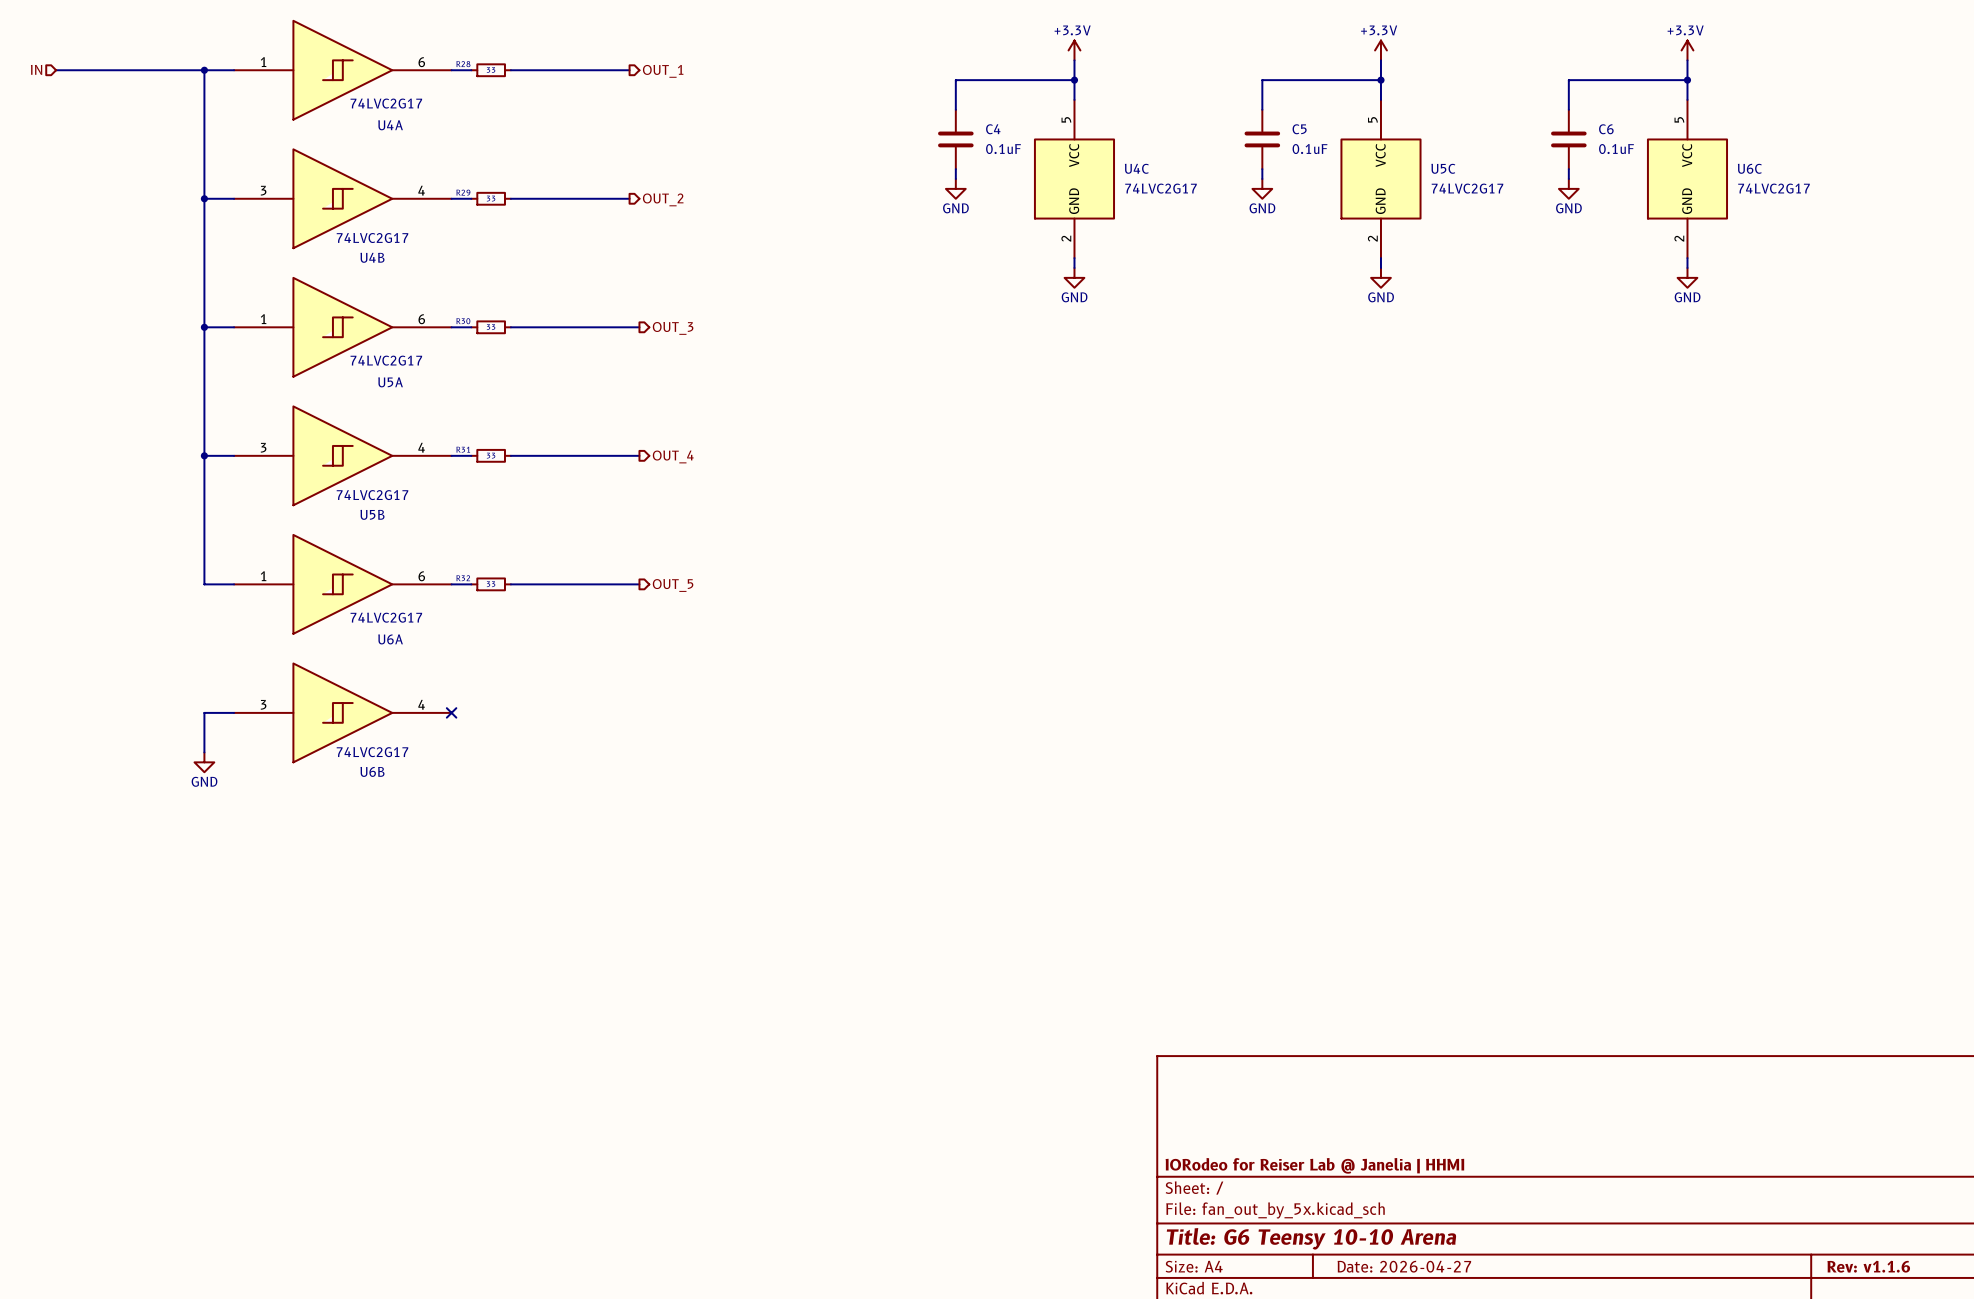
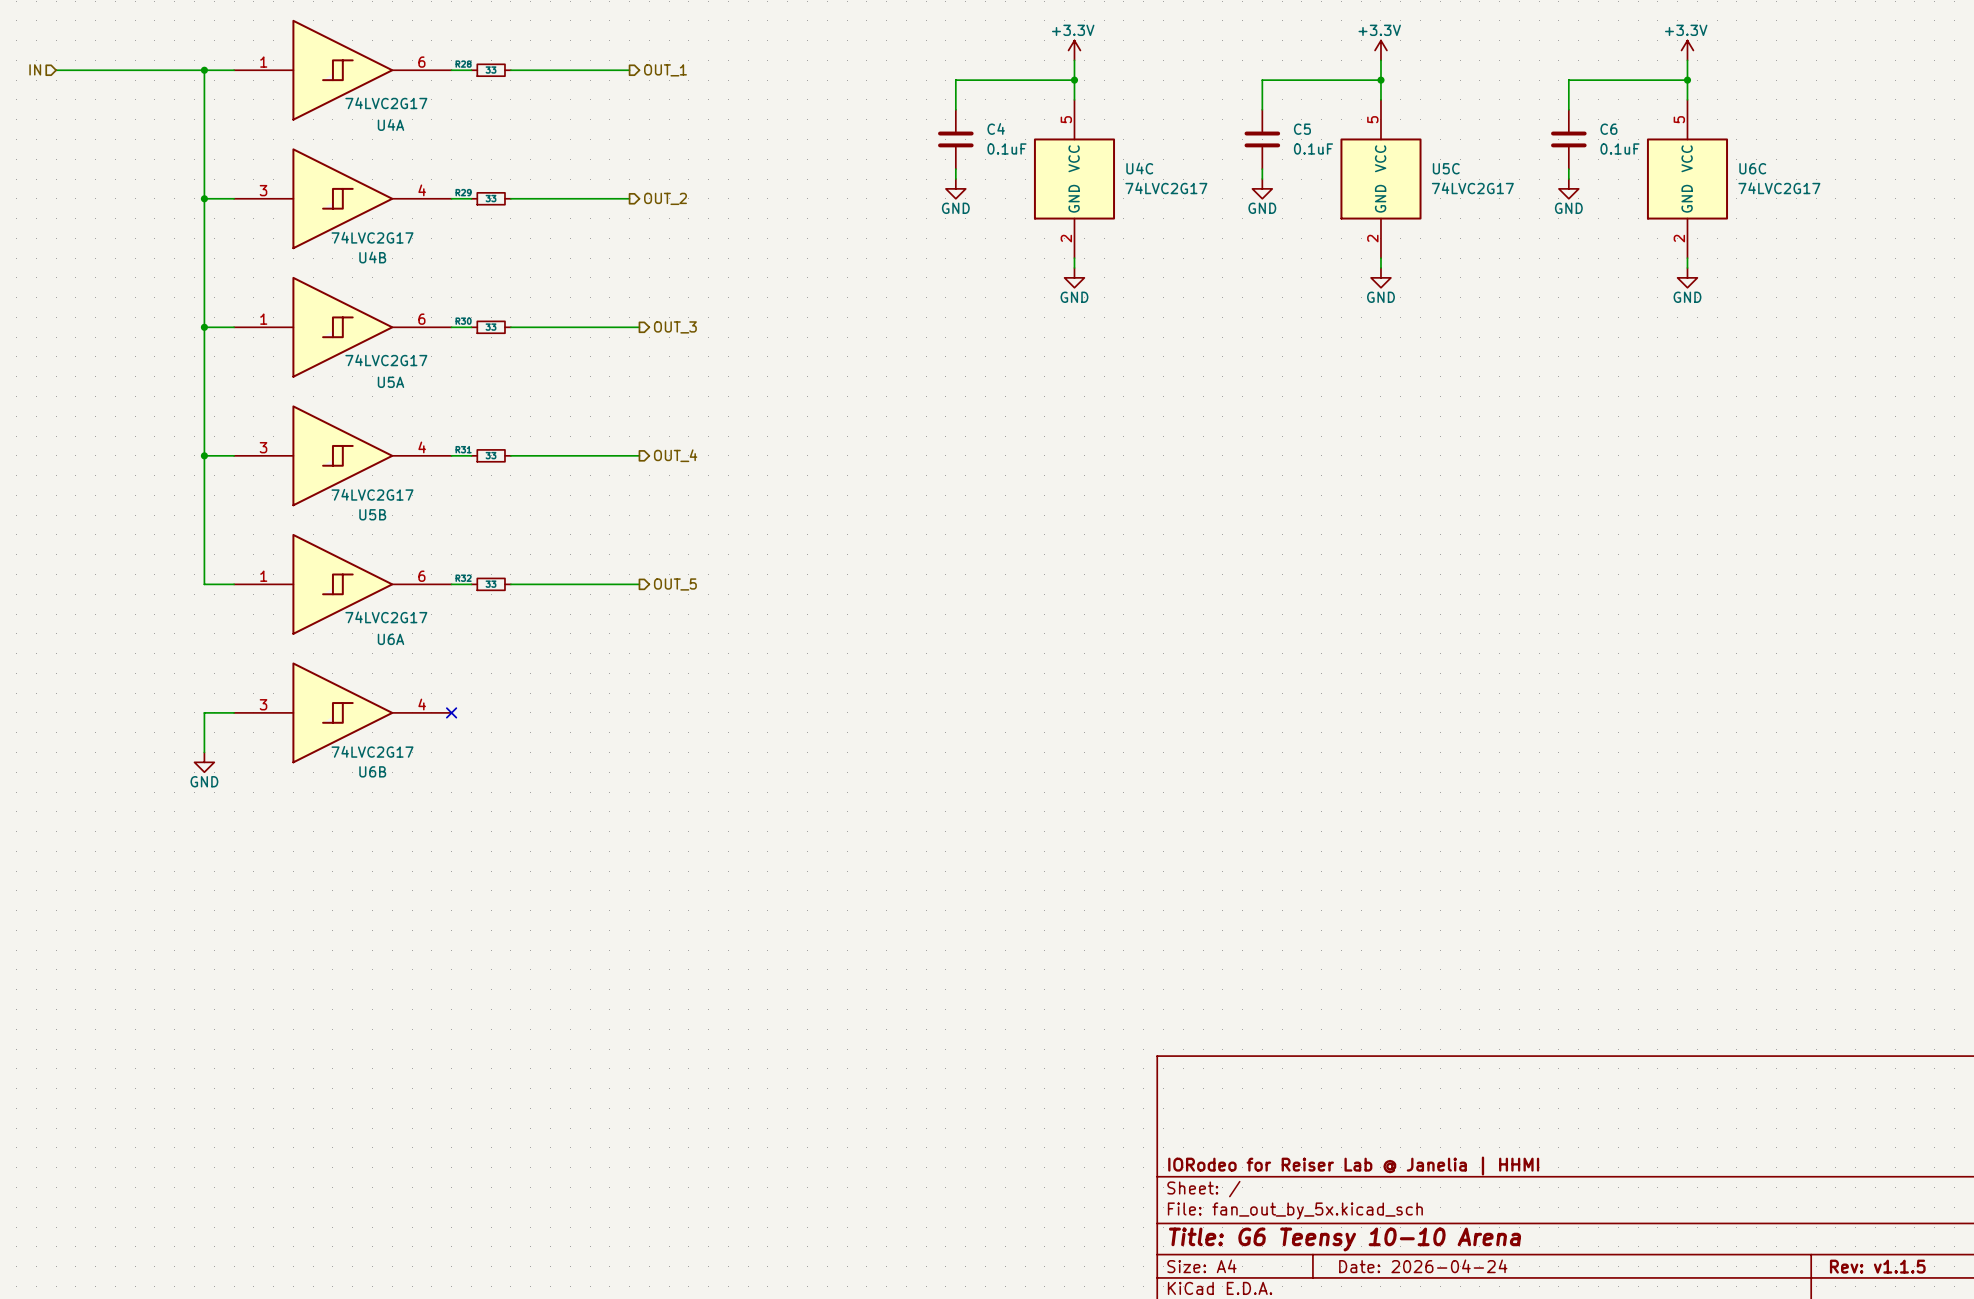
title block: Date: 2026-04-27 (1404, 1266) -> Date: 2026-04-24 (1423, 1266)
title block: Rev: v1.1.6 (1868, 1266) -> Rev: v1.1.5 (1877, 1266)

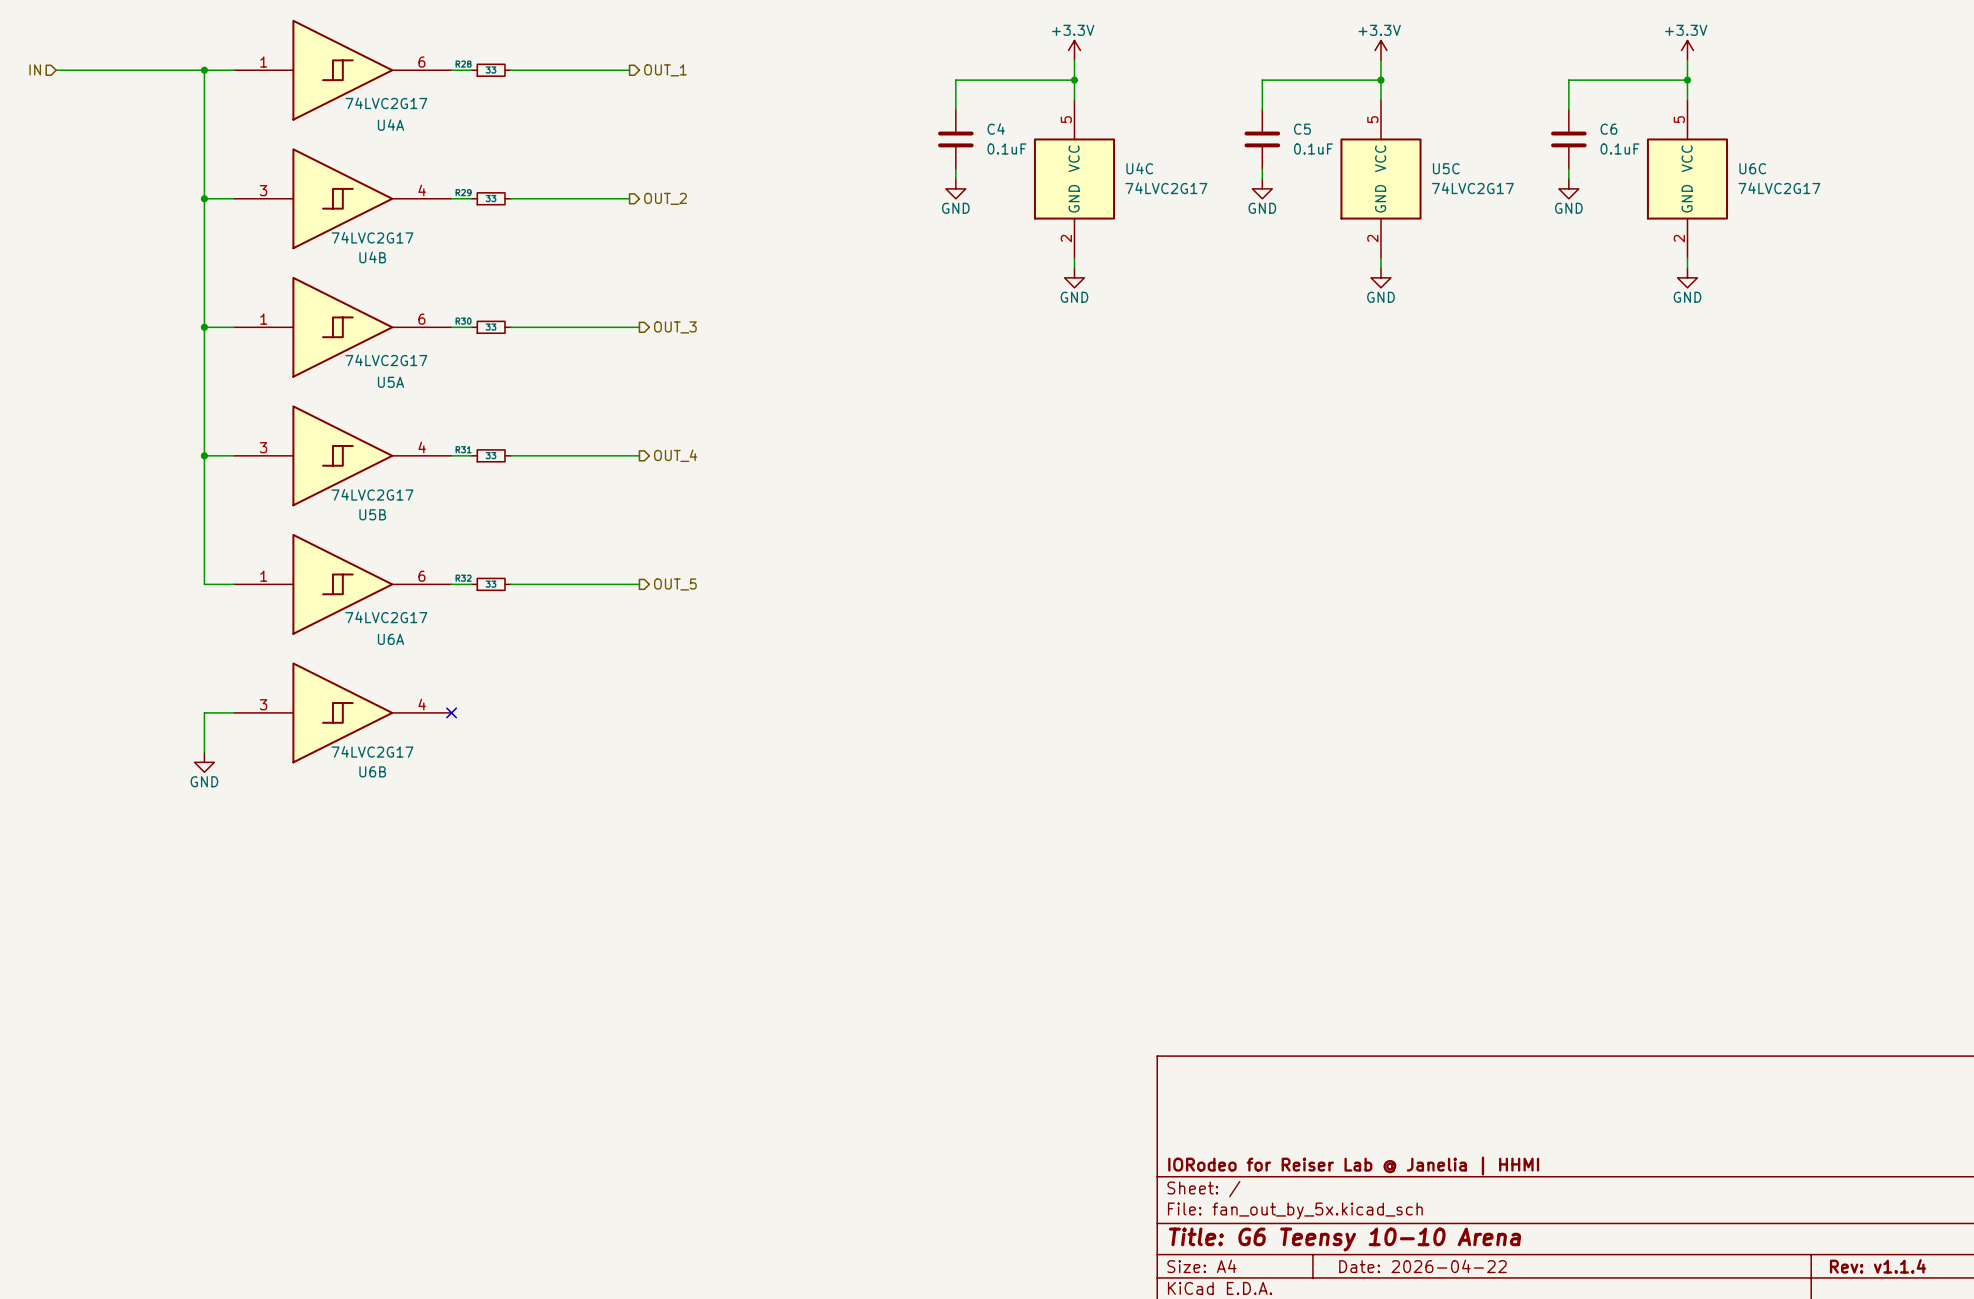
title block: Date: 2026-04-24 (1423, 1266) -> Date: 2026-04-22 (1422, 1266)
title block: Rev: v1.1.5 (1877, 1266) -> Rev: v1.1.4 (1878, 1266)

